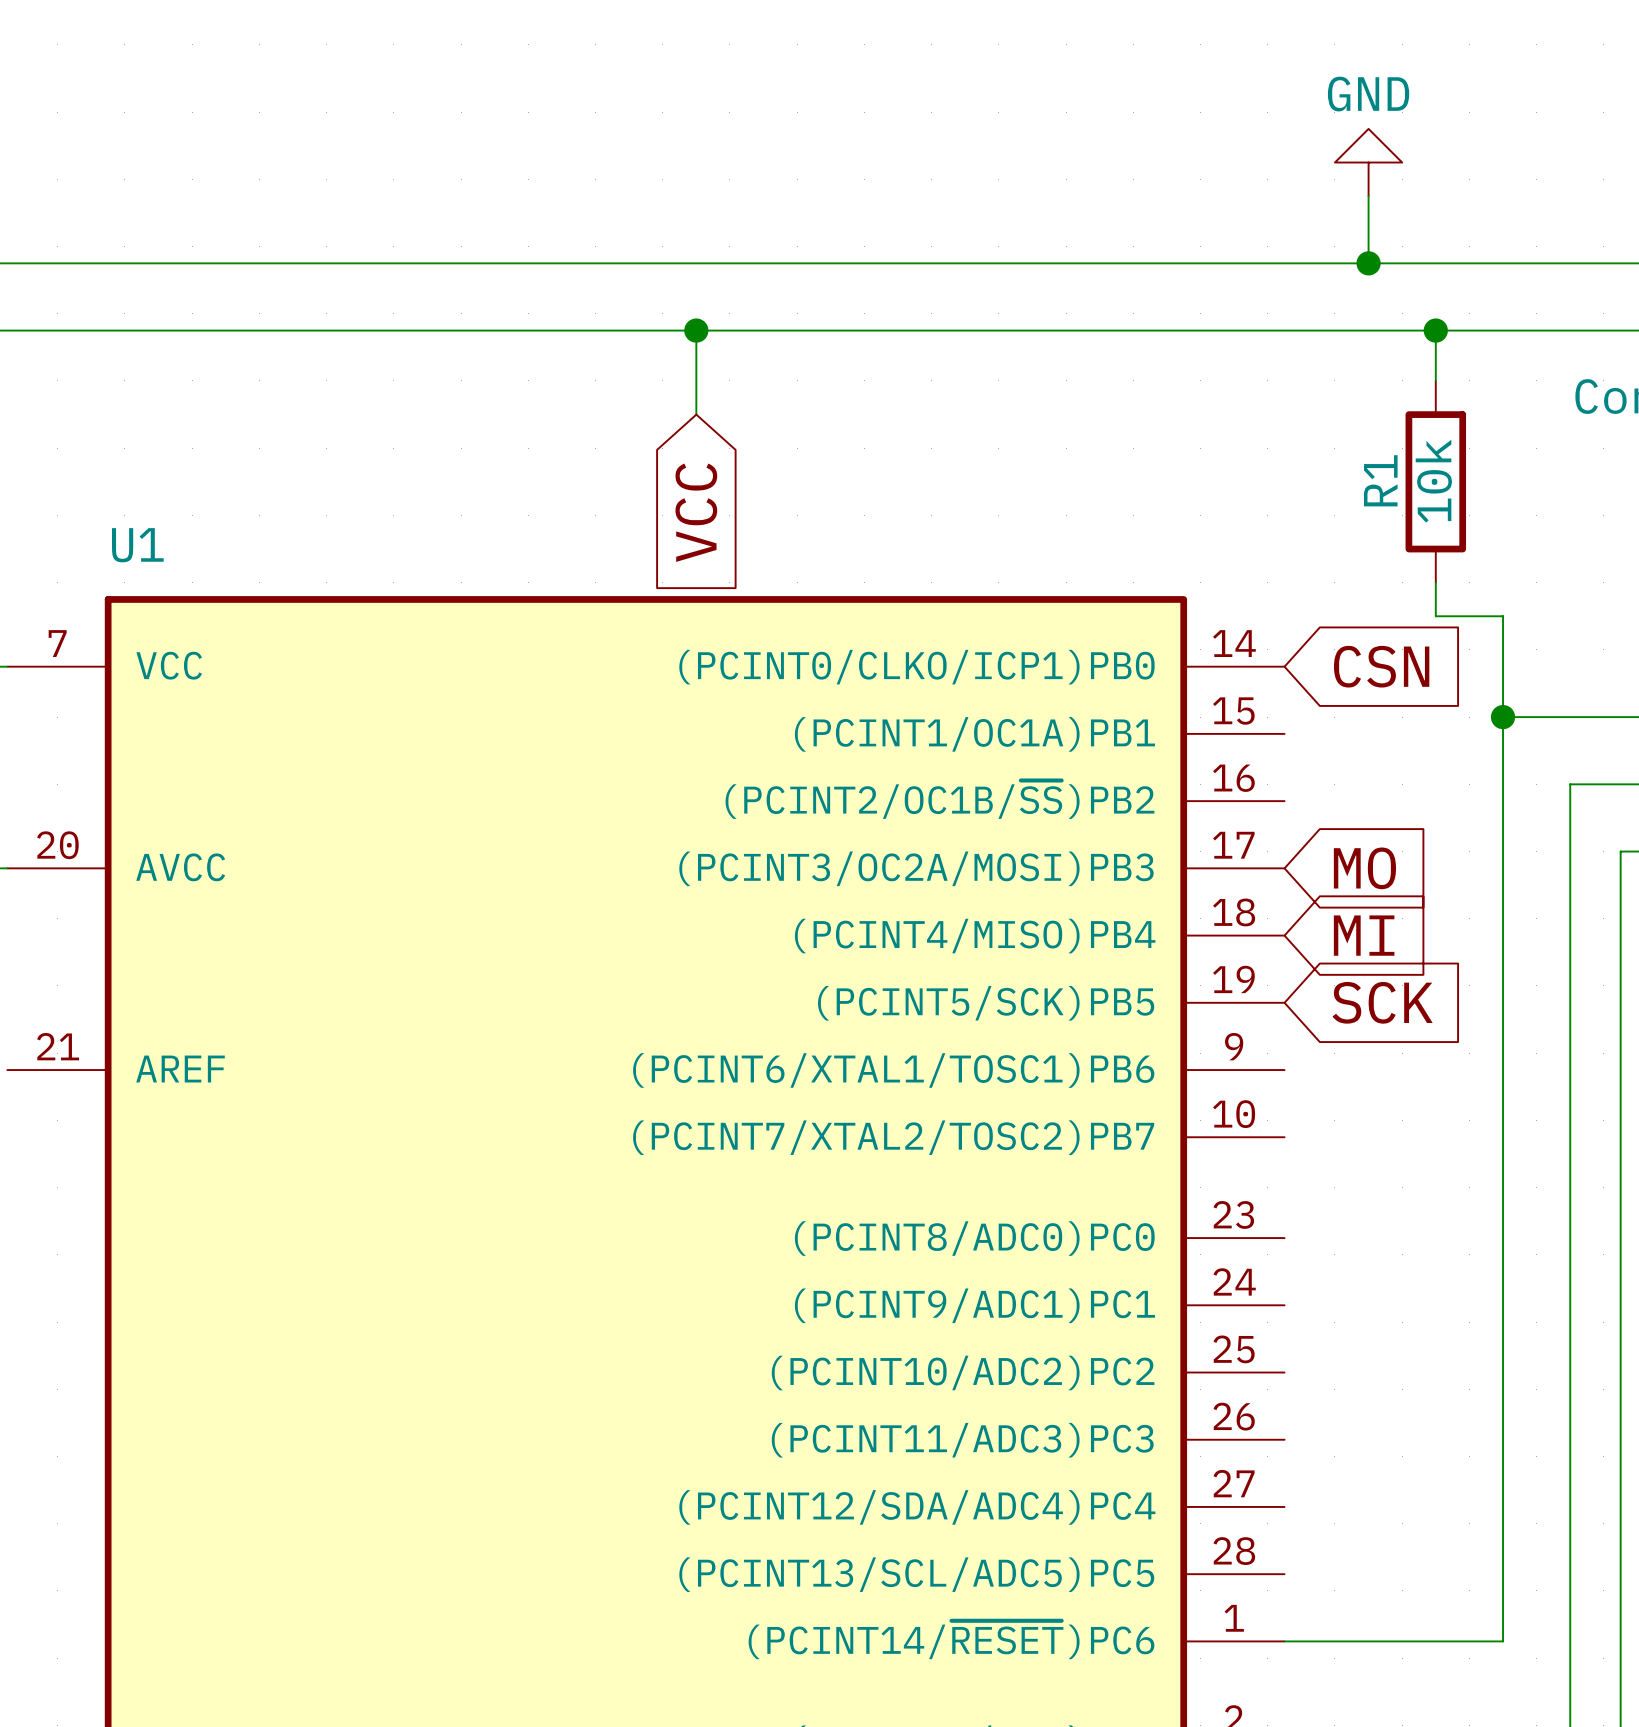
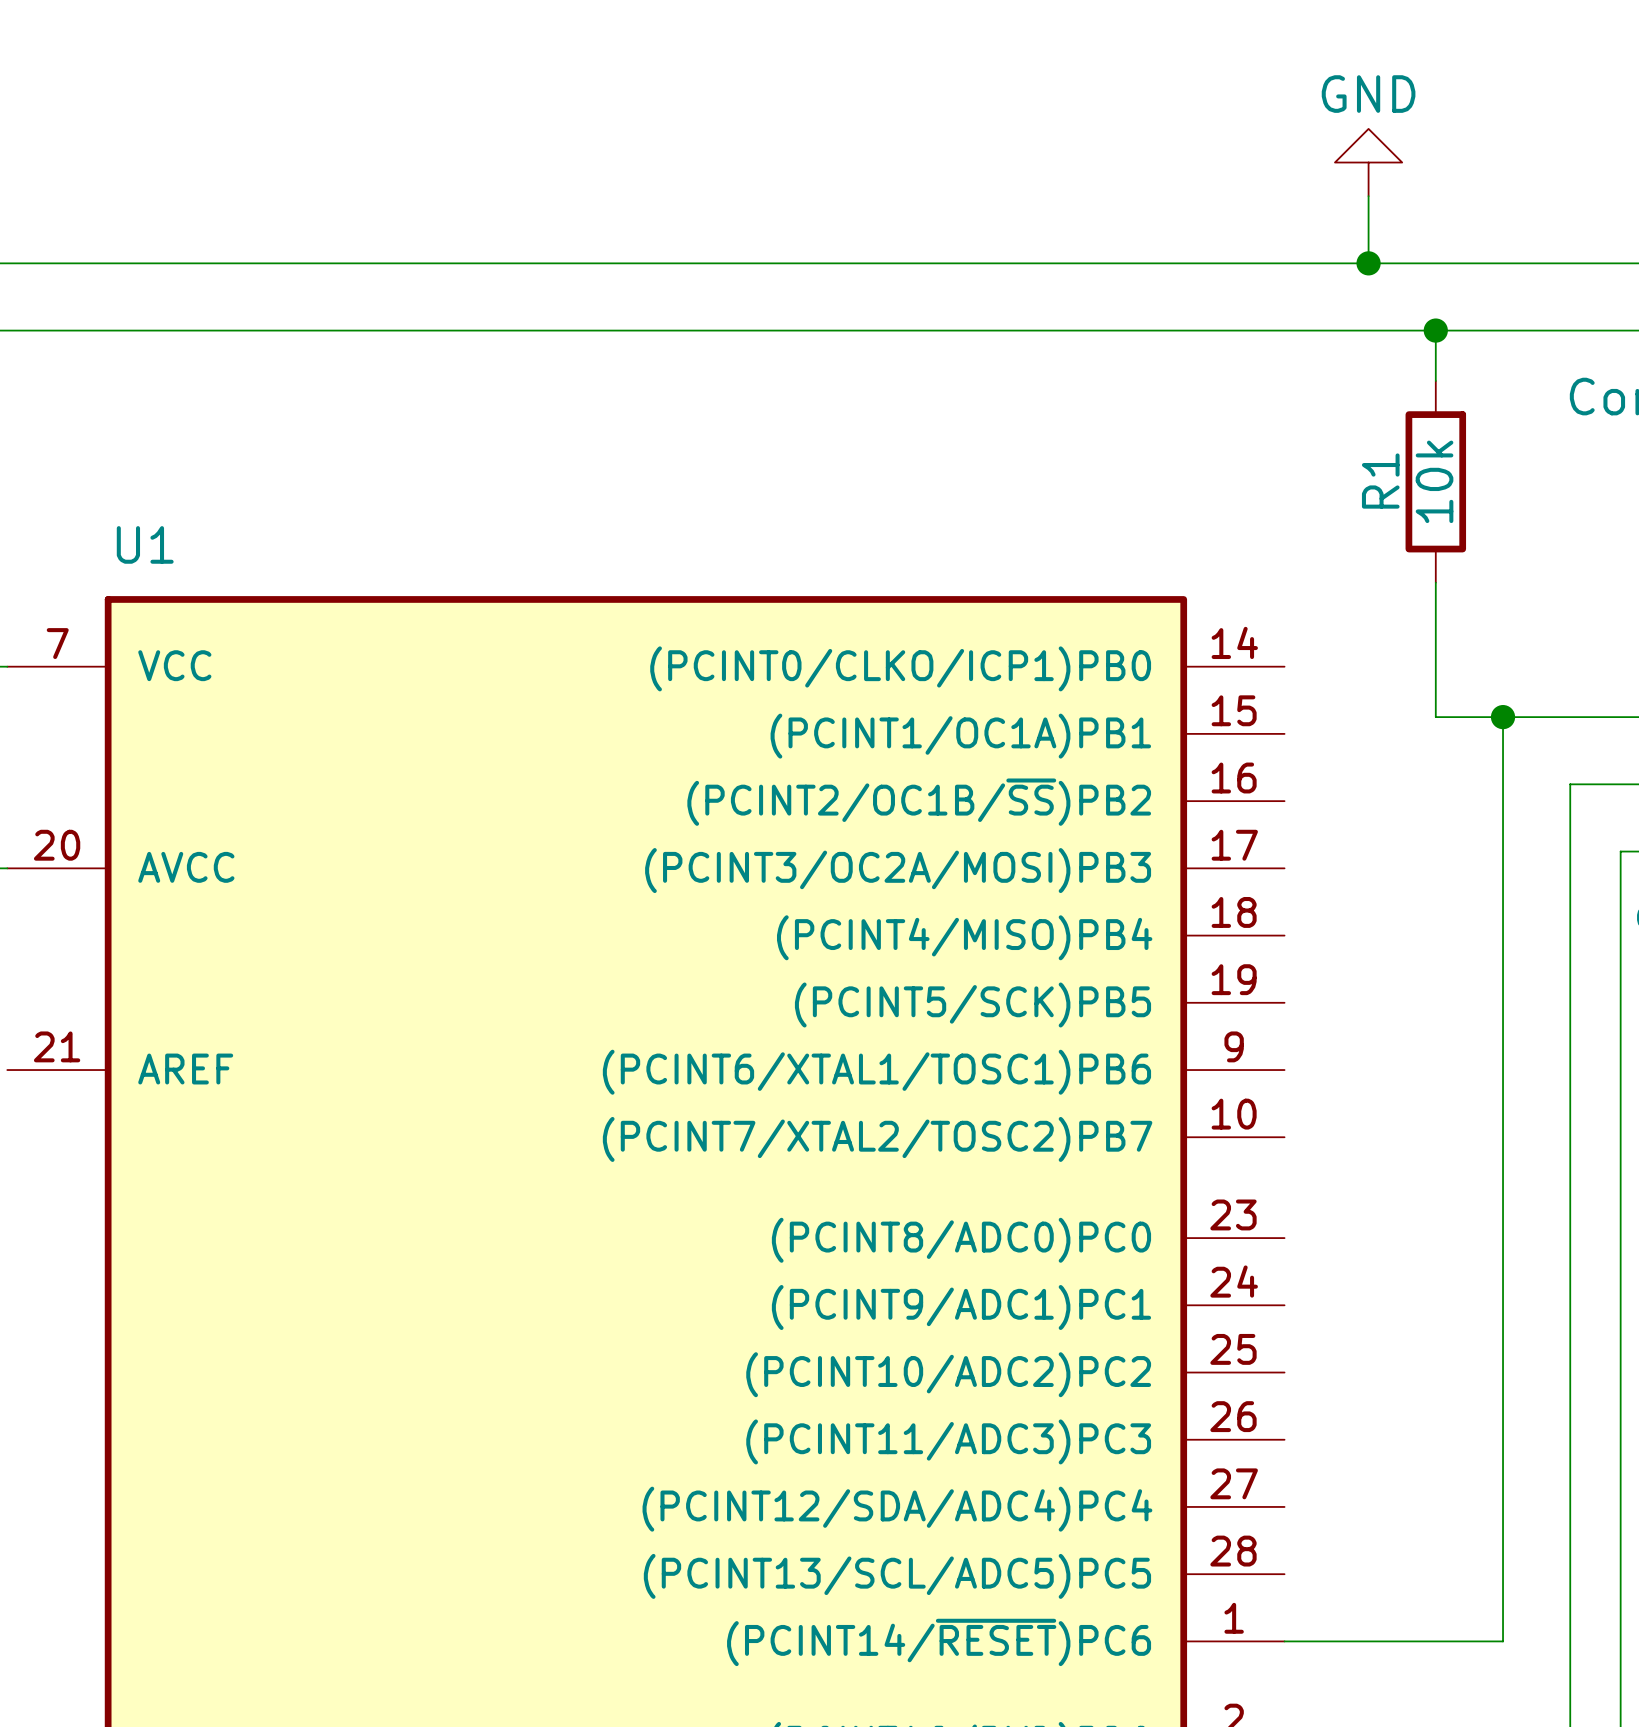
wire: (696, 330) (696, 414) -> none
junction: (696, 330) -> none
global label: VCC (696, 512) -> none
wire: (1435, 616) (1503, 616) (1503, 717) -> (1435, 616) (1435, 717) (1503, 717)
global label: CSN (1381, 666) -> none
global label: MO (1364, 868) -> none
global label: MI (1364, 935) -> none
global label: SCK (1382, 1002) -> none

